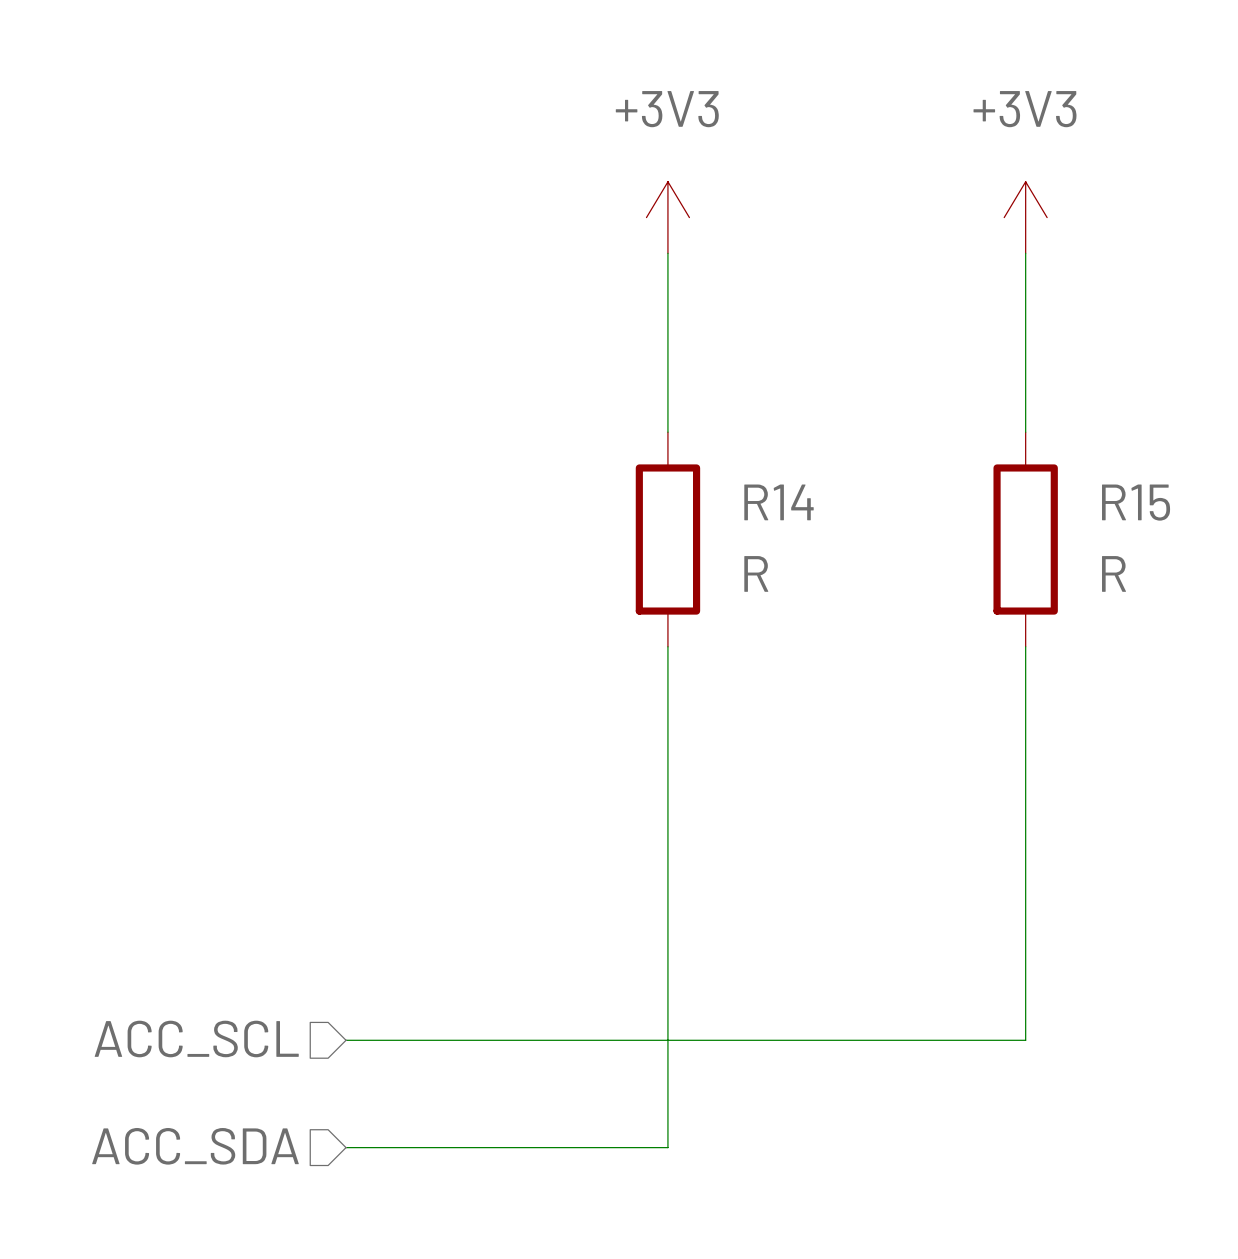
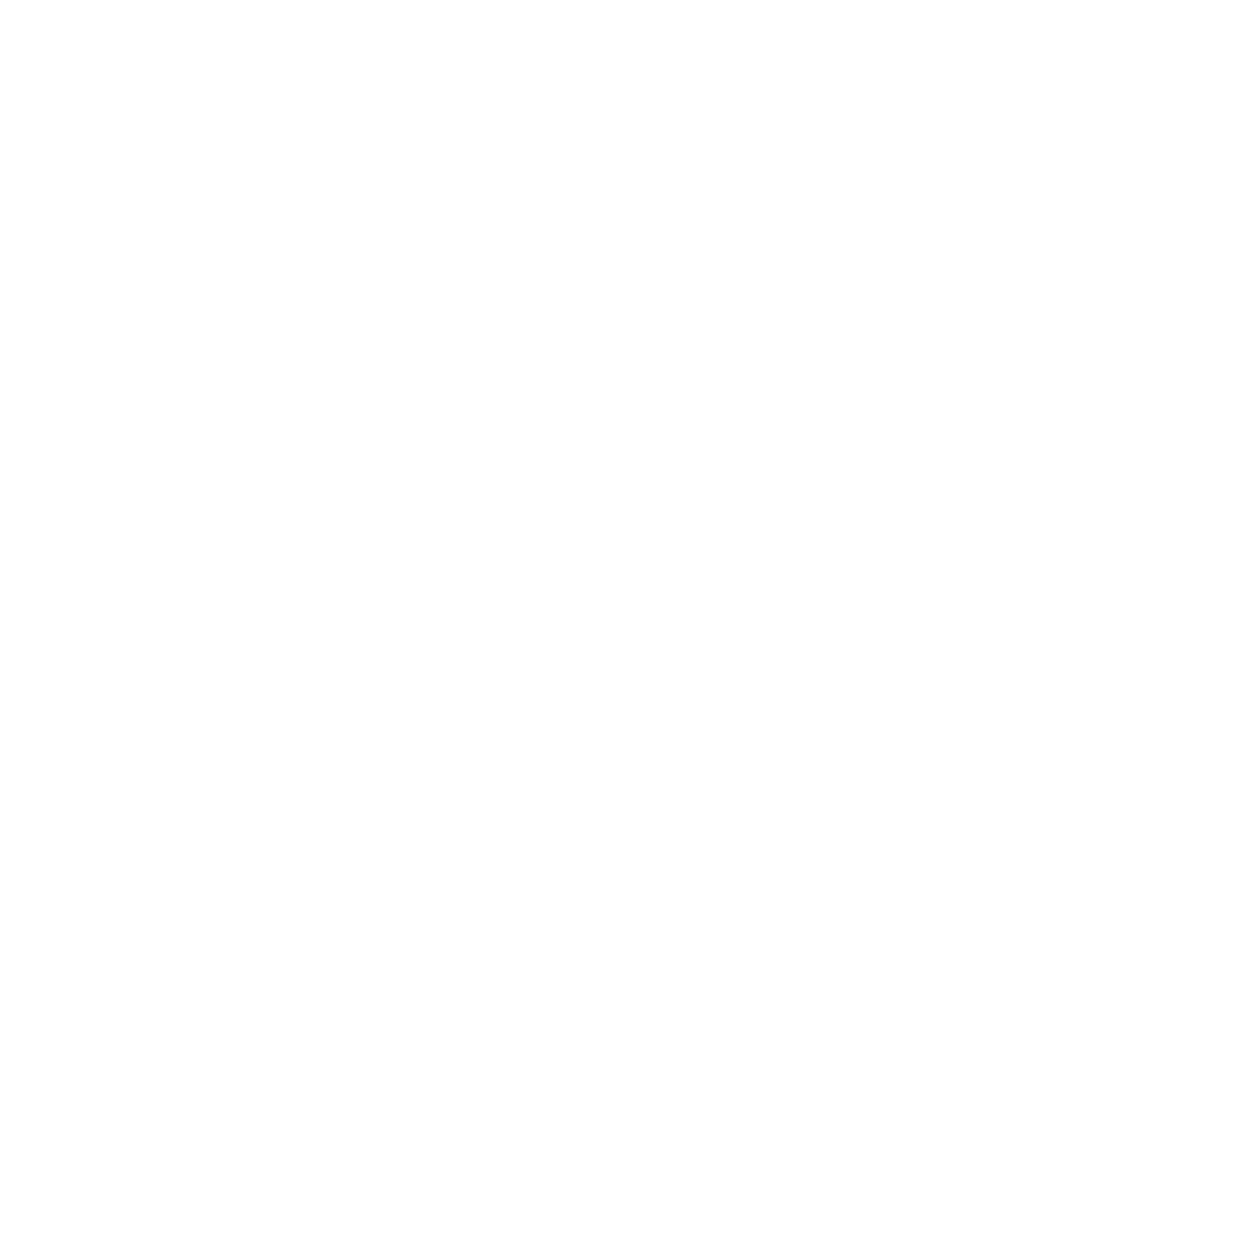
power symbol: +3V3 (667, 217) -> none
power symbol: +3V3 (1025, 217) -> none
wire: (667, 253) (667, 432) -> none
wire: (1025, 253) (1025, 432) -> none
R14: R (667, 539) -> none
R15: R (1025, 539) -> none
wire: (667, 646) (667, 1147) (346, 1147) -> none
wire: (1025, 646) (1025, 1040) (346, 1040) -> none
hierarchical label: ACC_SCL (196, 1039) -> none
hierarchical label: ACC_SDA (195, 1146) -> none

